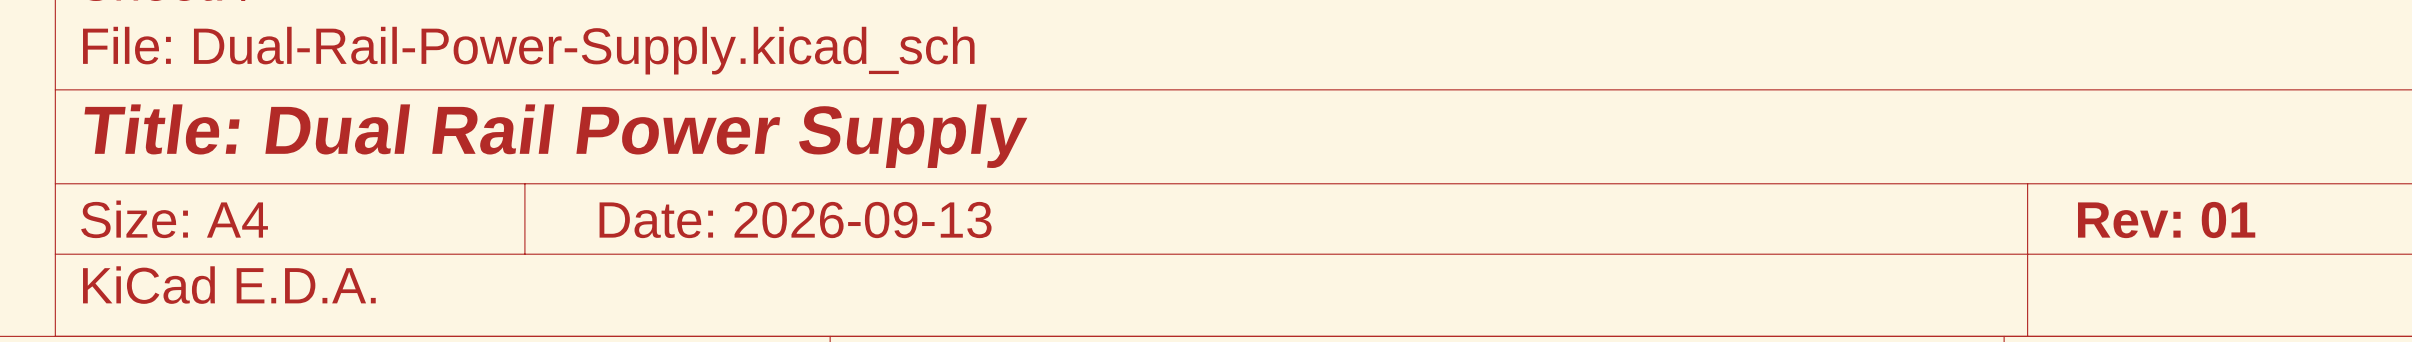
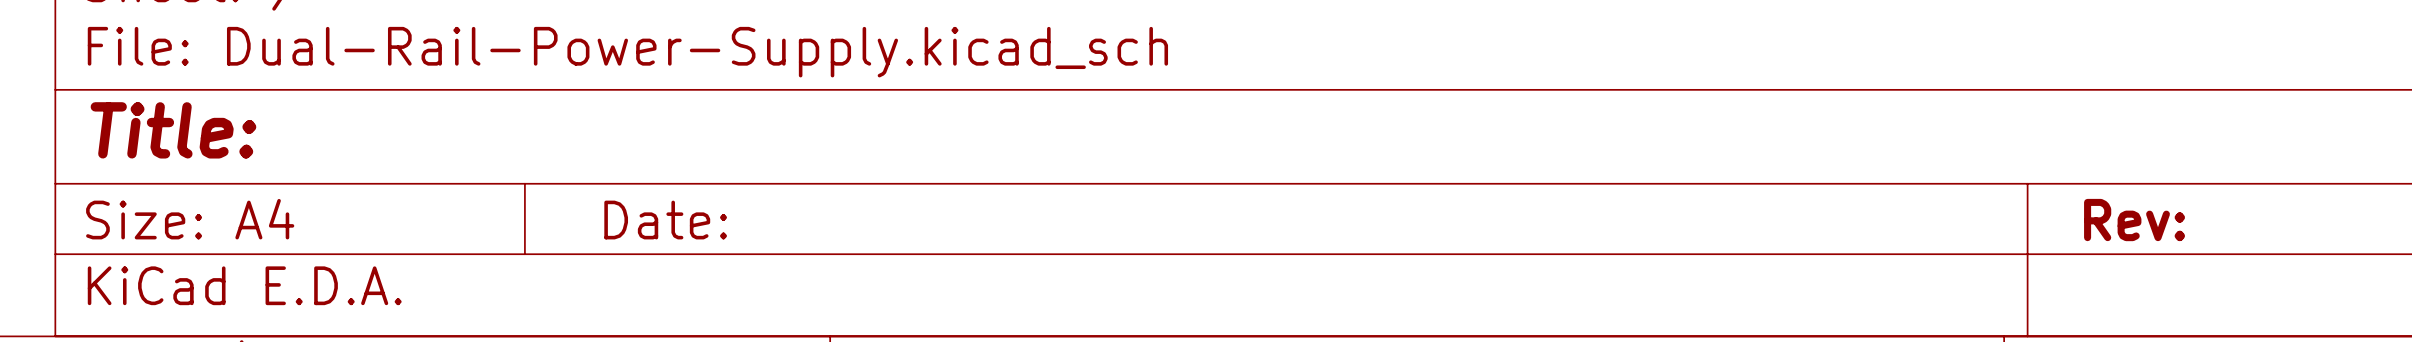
title block: Title: Dual Rail Power Supply (555, 136) -> Title: (173, 130)
title block: Date: 2026-09-13 (795, 220) -> Date: (665, 220)
title block: Rev: 01 (2166, 220) -> Rev: (2134, 220)

